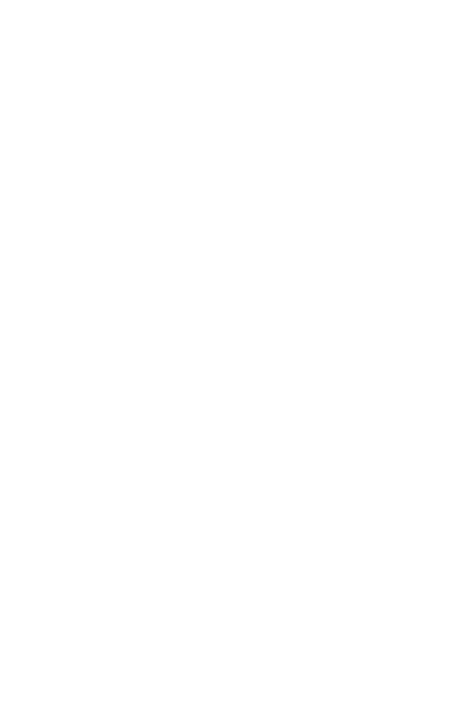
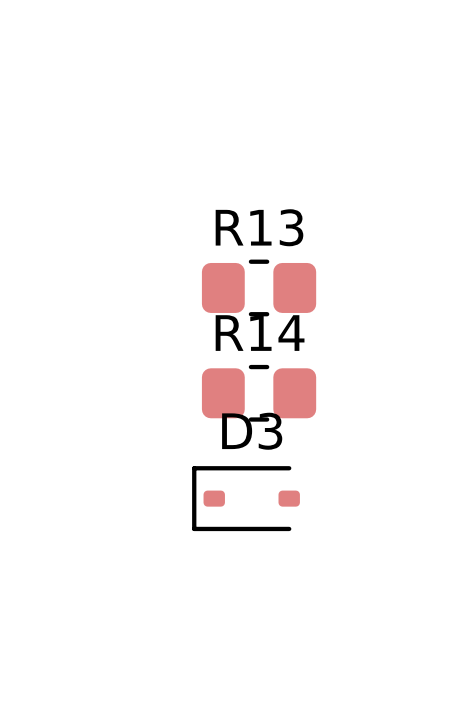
R13: none -> (259, 287)
R14: none -> (259, 393)
D3: none -> (246, 498)

